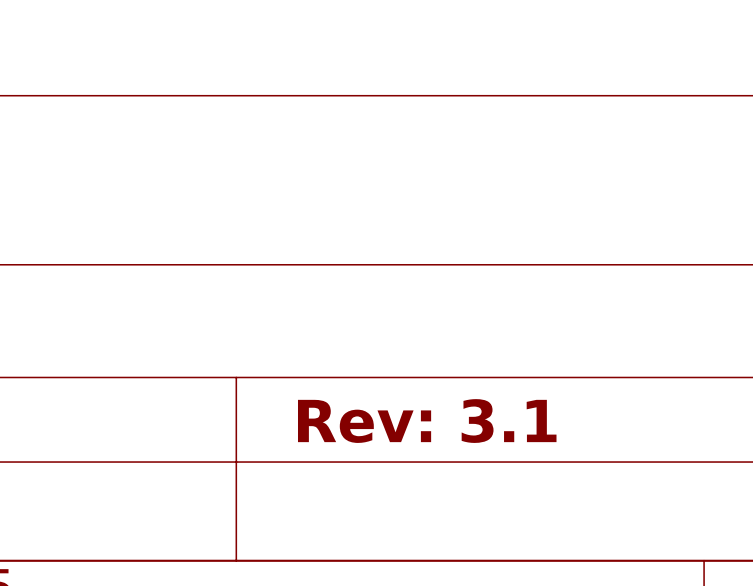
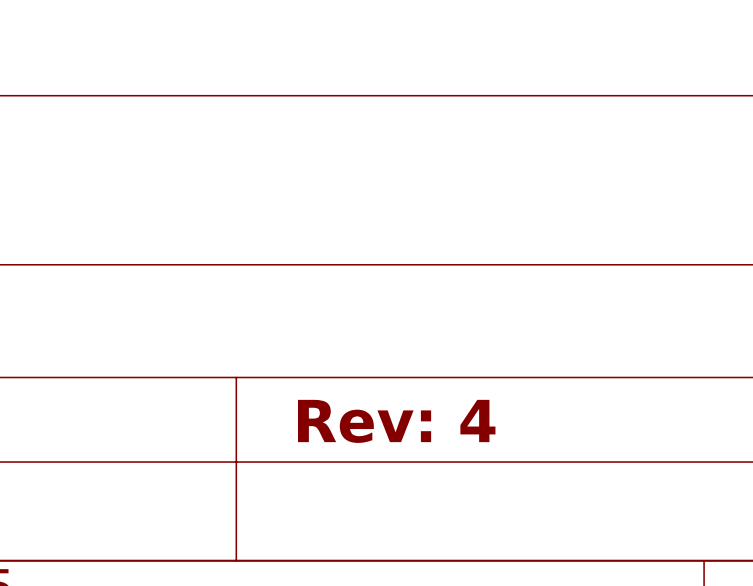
title block: Rev: 3.1 (427, 421) -> Rev: 4 (396, 421)

